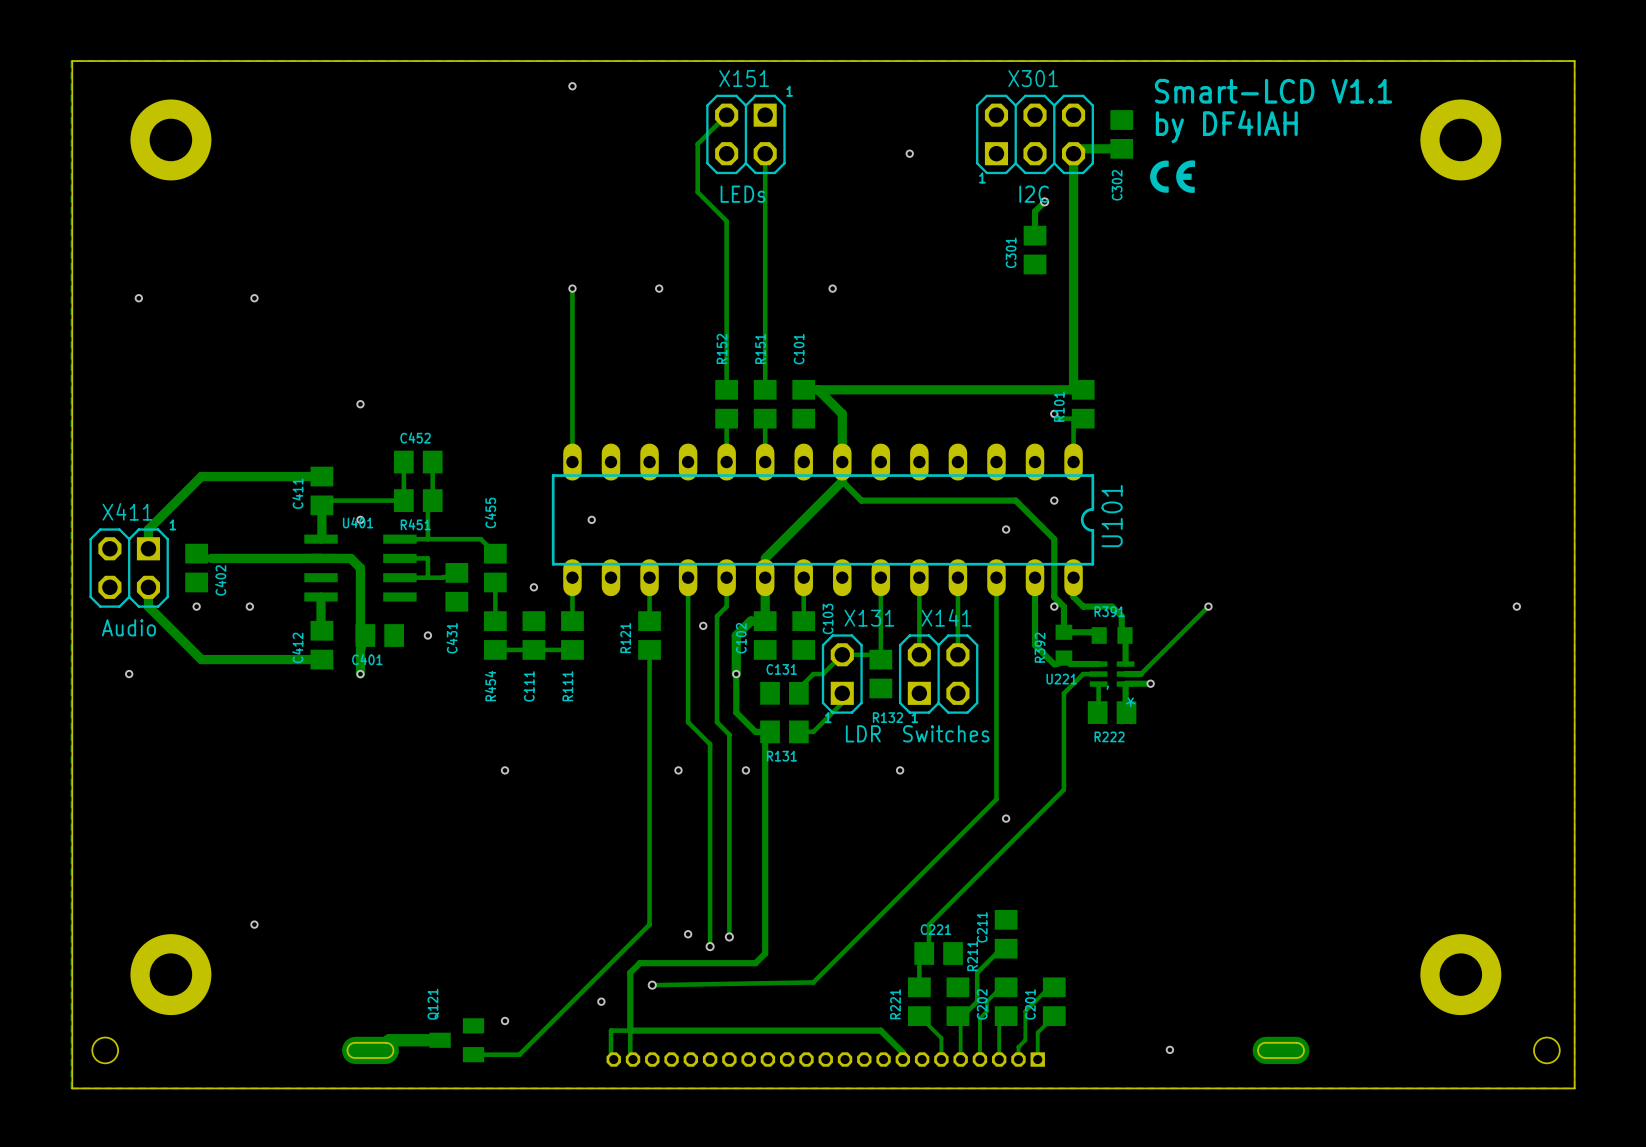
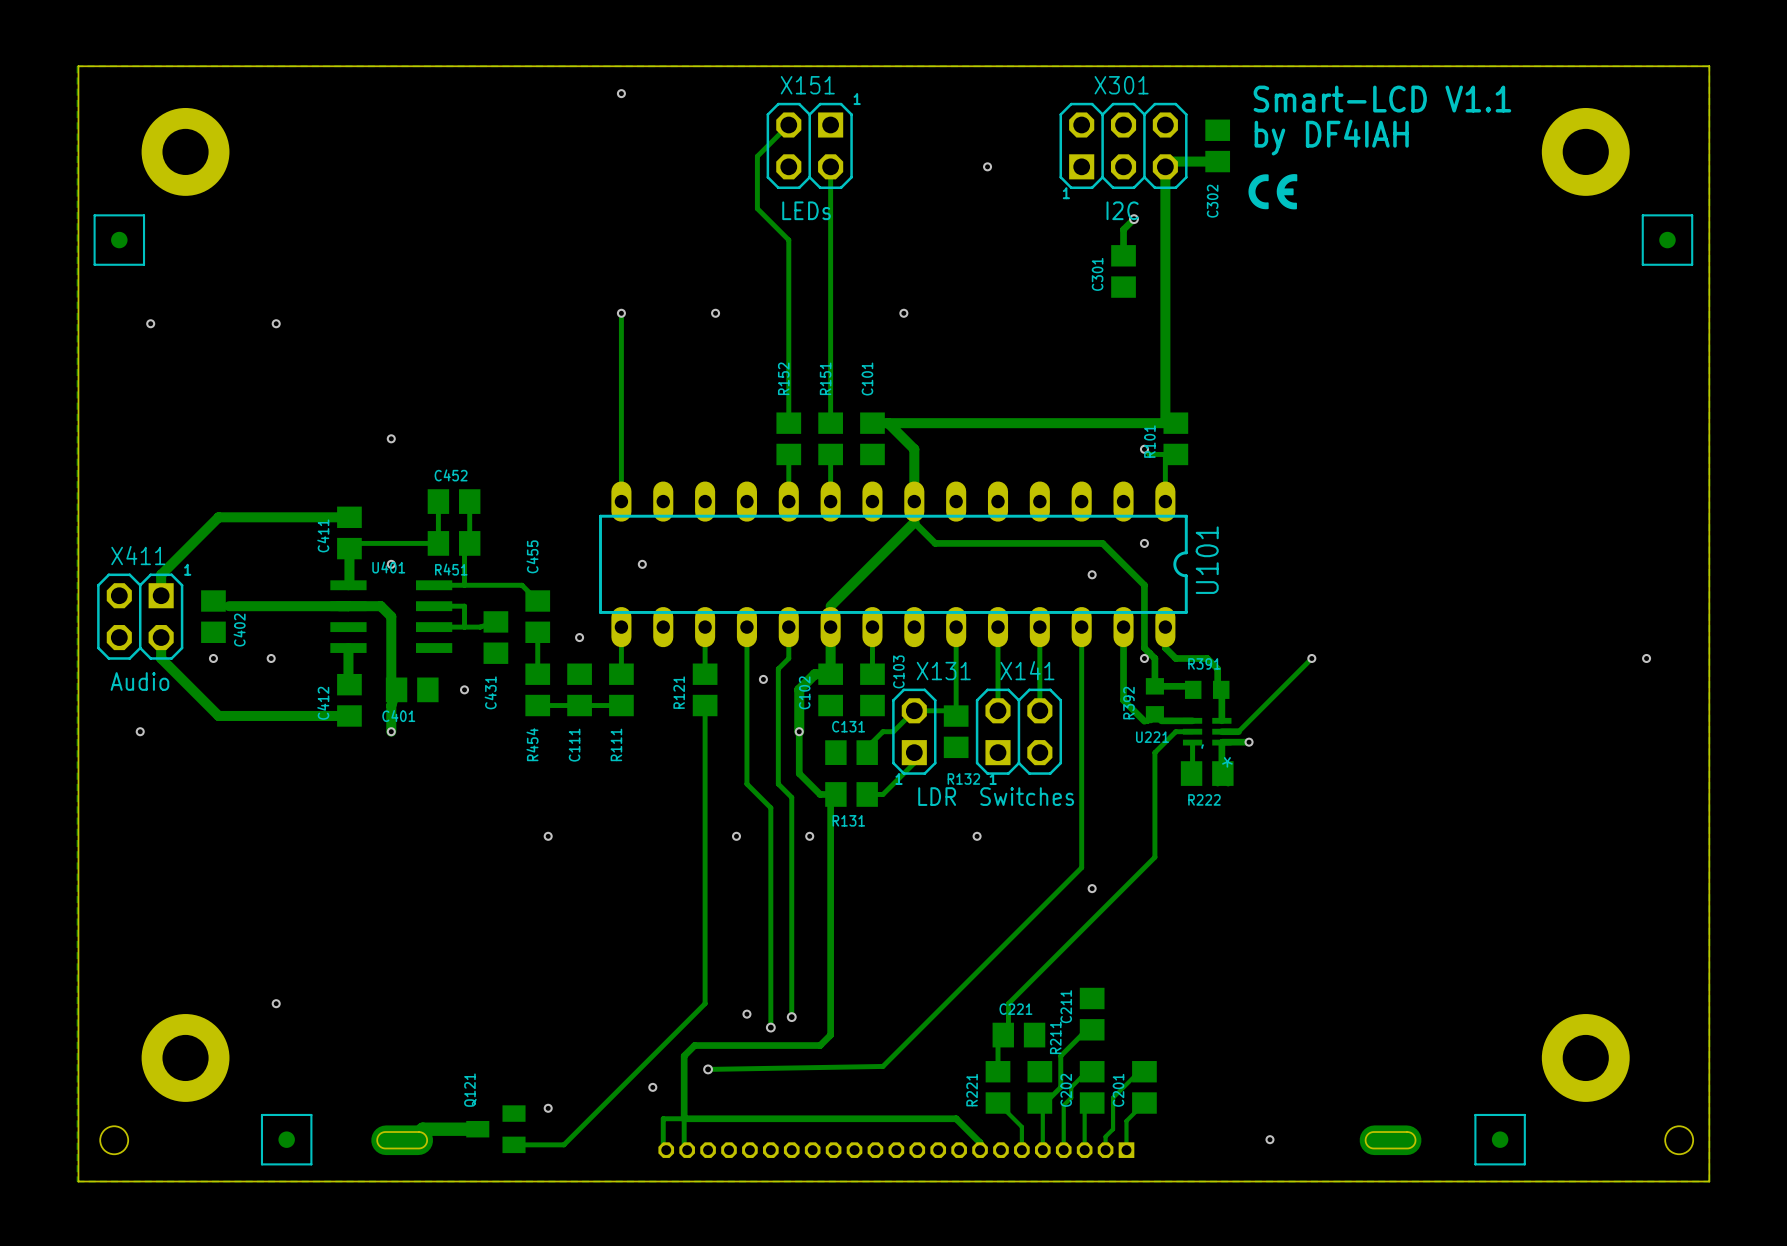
drawing: none -> [93, 214, 146, 266]
drawing: none -> [1641, 214, 1694, 266]
drawing: none -> [260, 1113, 313, 1166]
drawing: none -> [1474, 1113, 1526, 1166]

